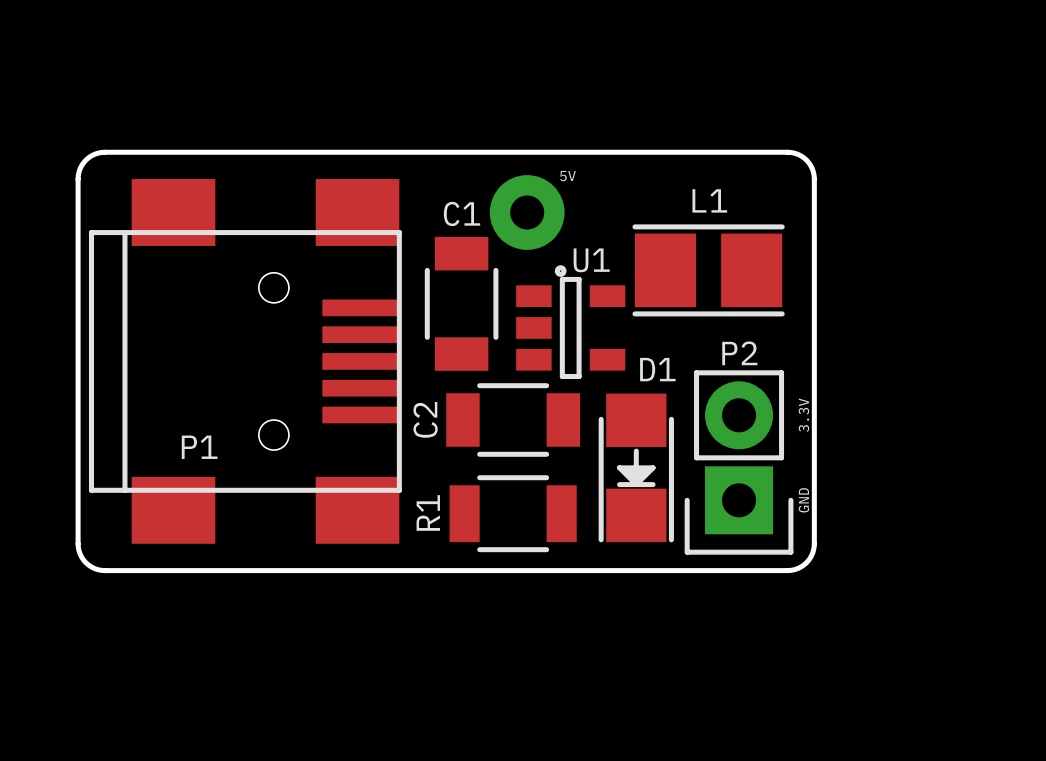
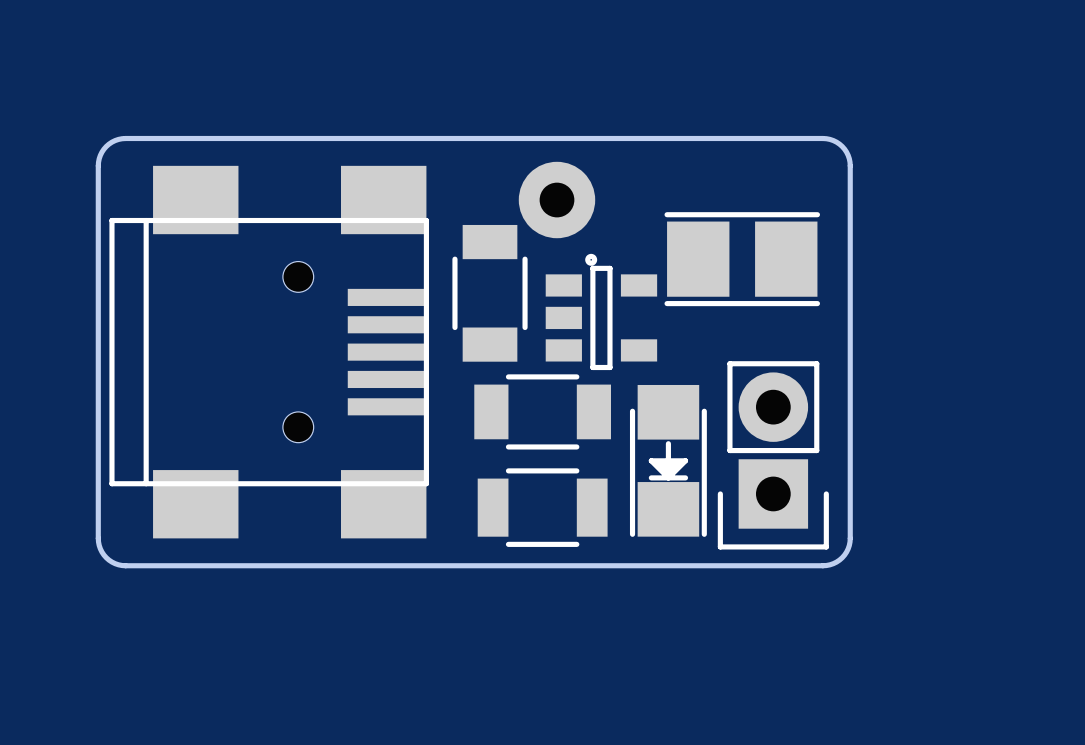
5V name: 5V (567, 176) -> none
L1 name: L1 (709, 200) -> none
C1 name: C1 (461, 213) -> none
U1 name: U1 (591, 260) -> none
P2 name: P2 (739, 353) -> none
D1 name: D1 (657, 369) -> none
text: 3.3V (803, 415) -> none
C2 name: C2 (425, 419) -> none
P1 name: P1 (199, 447) -> none
text: GND (803, 500) -> none
R1 name: R1 (428, 512) -> none

